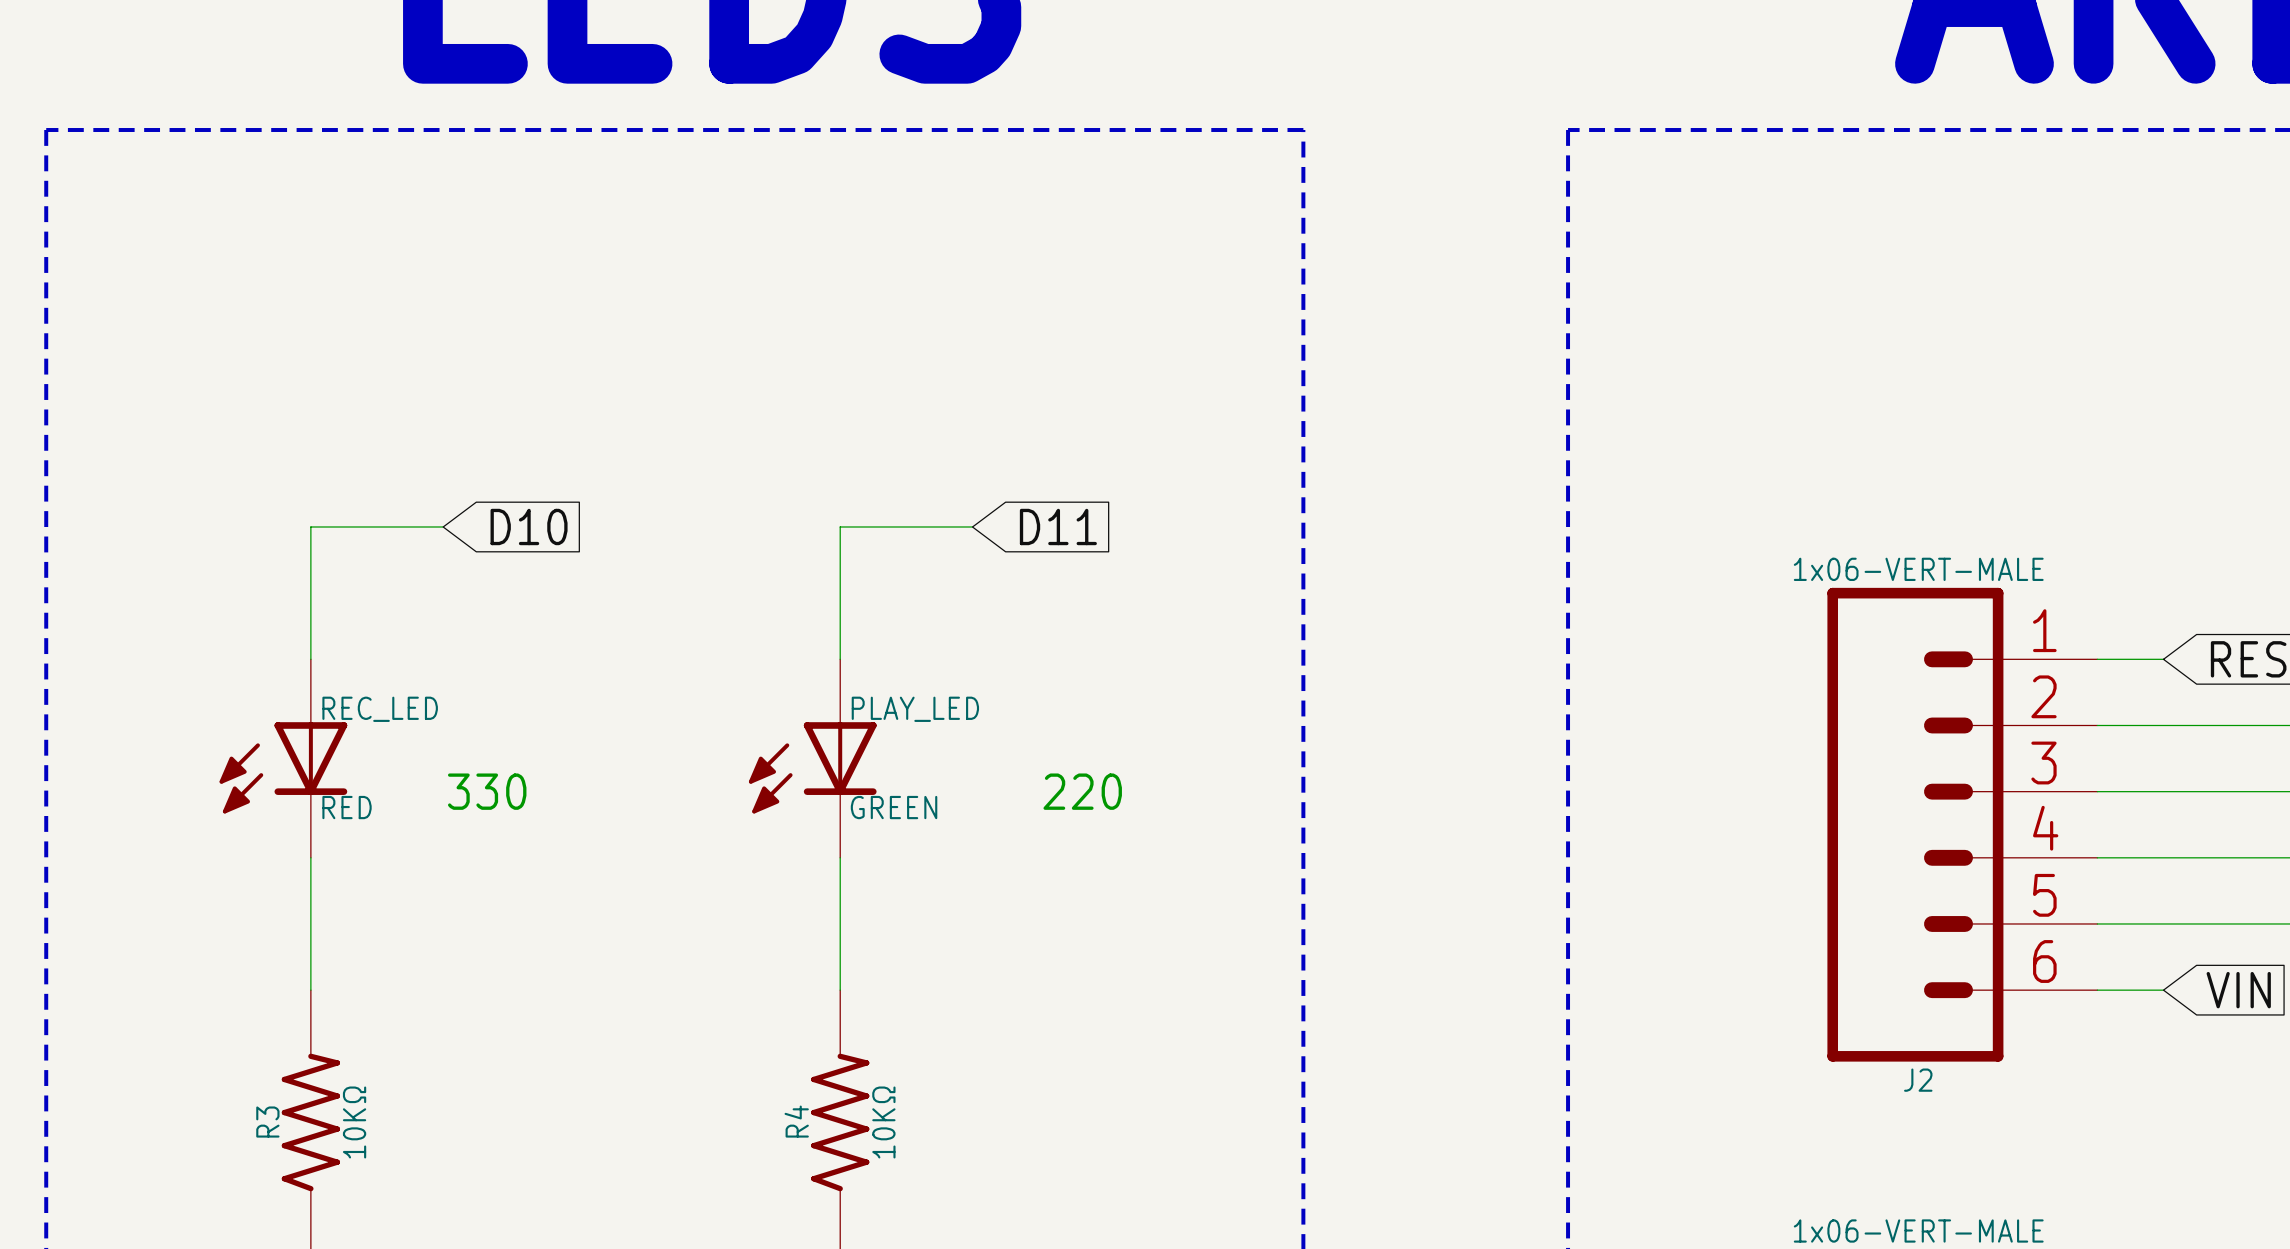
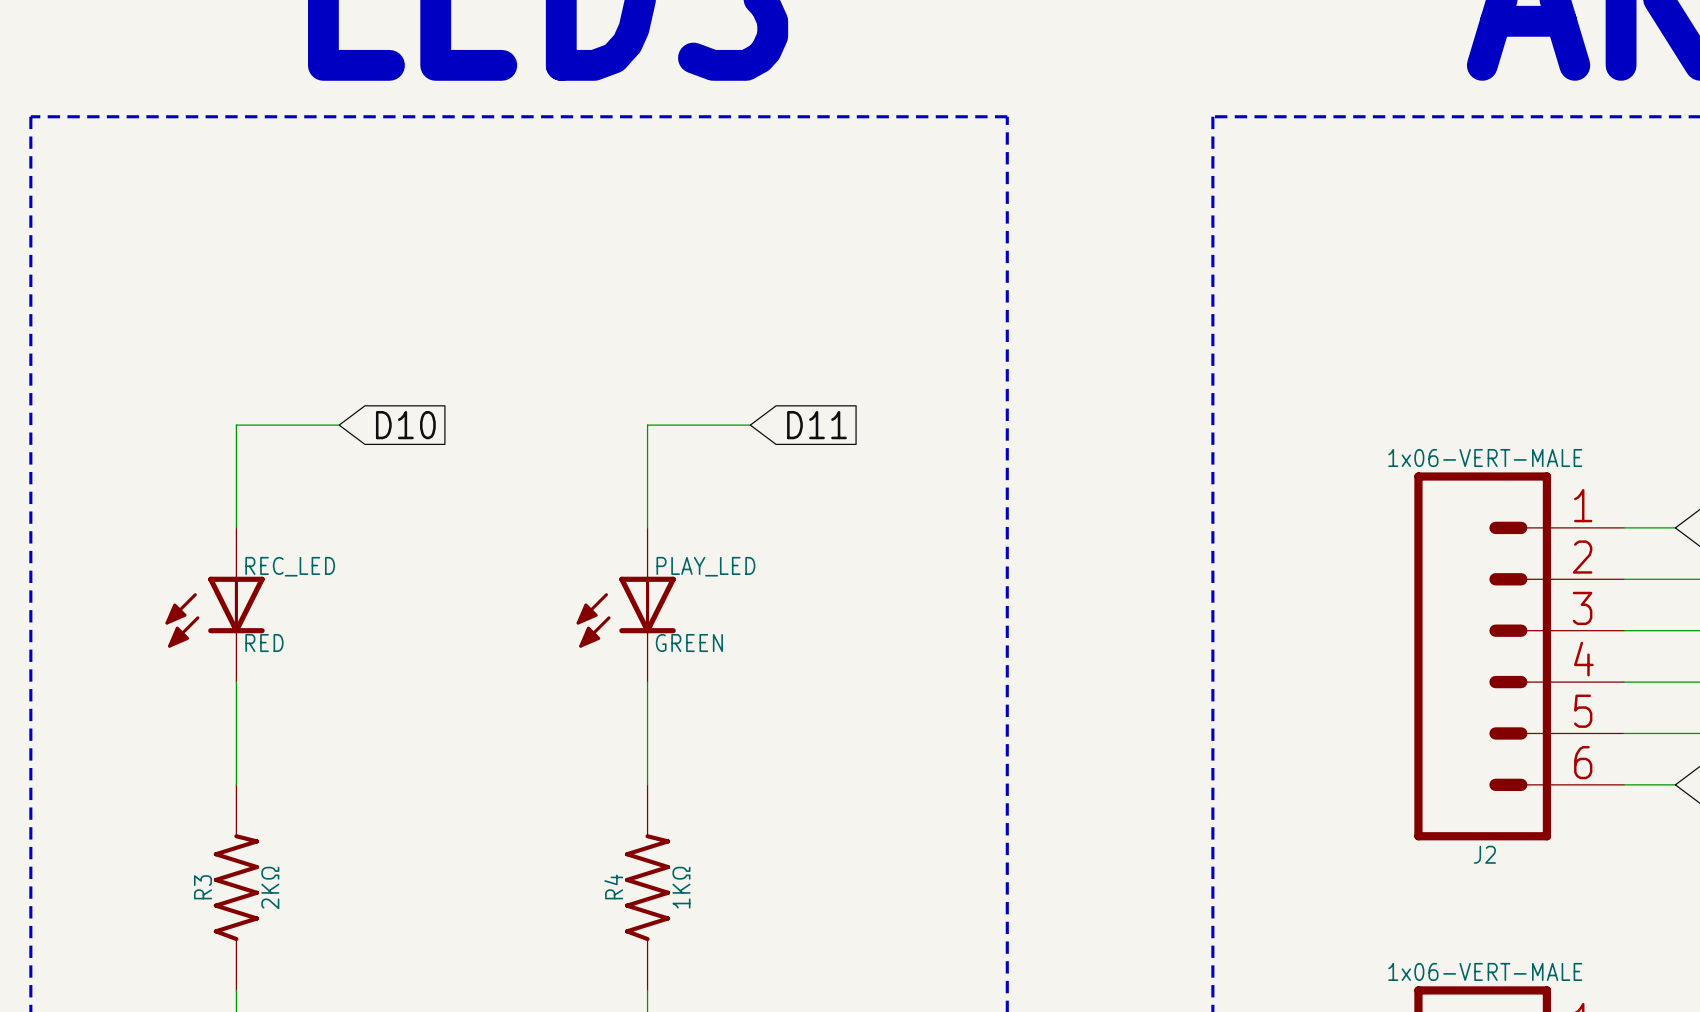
text: 330 (487, 791) -> none
text: 220 (1082, 791) -> none
R3 value: 10KΩ (354, 1122) -> 2KΩ (270, 888)
R4 value: 10KΩ (883, 1122) -> 1KΩ (681, 887)

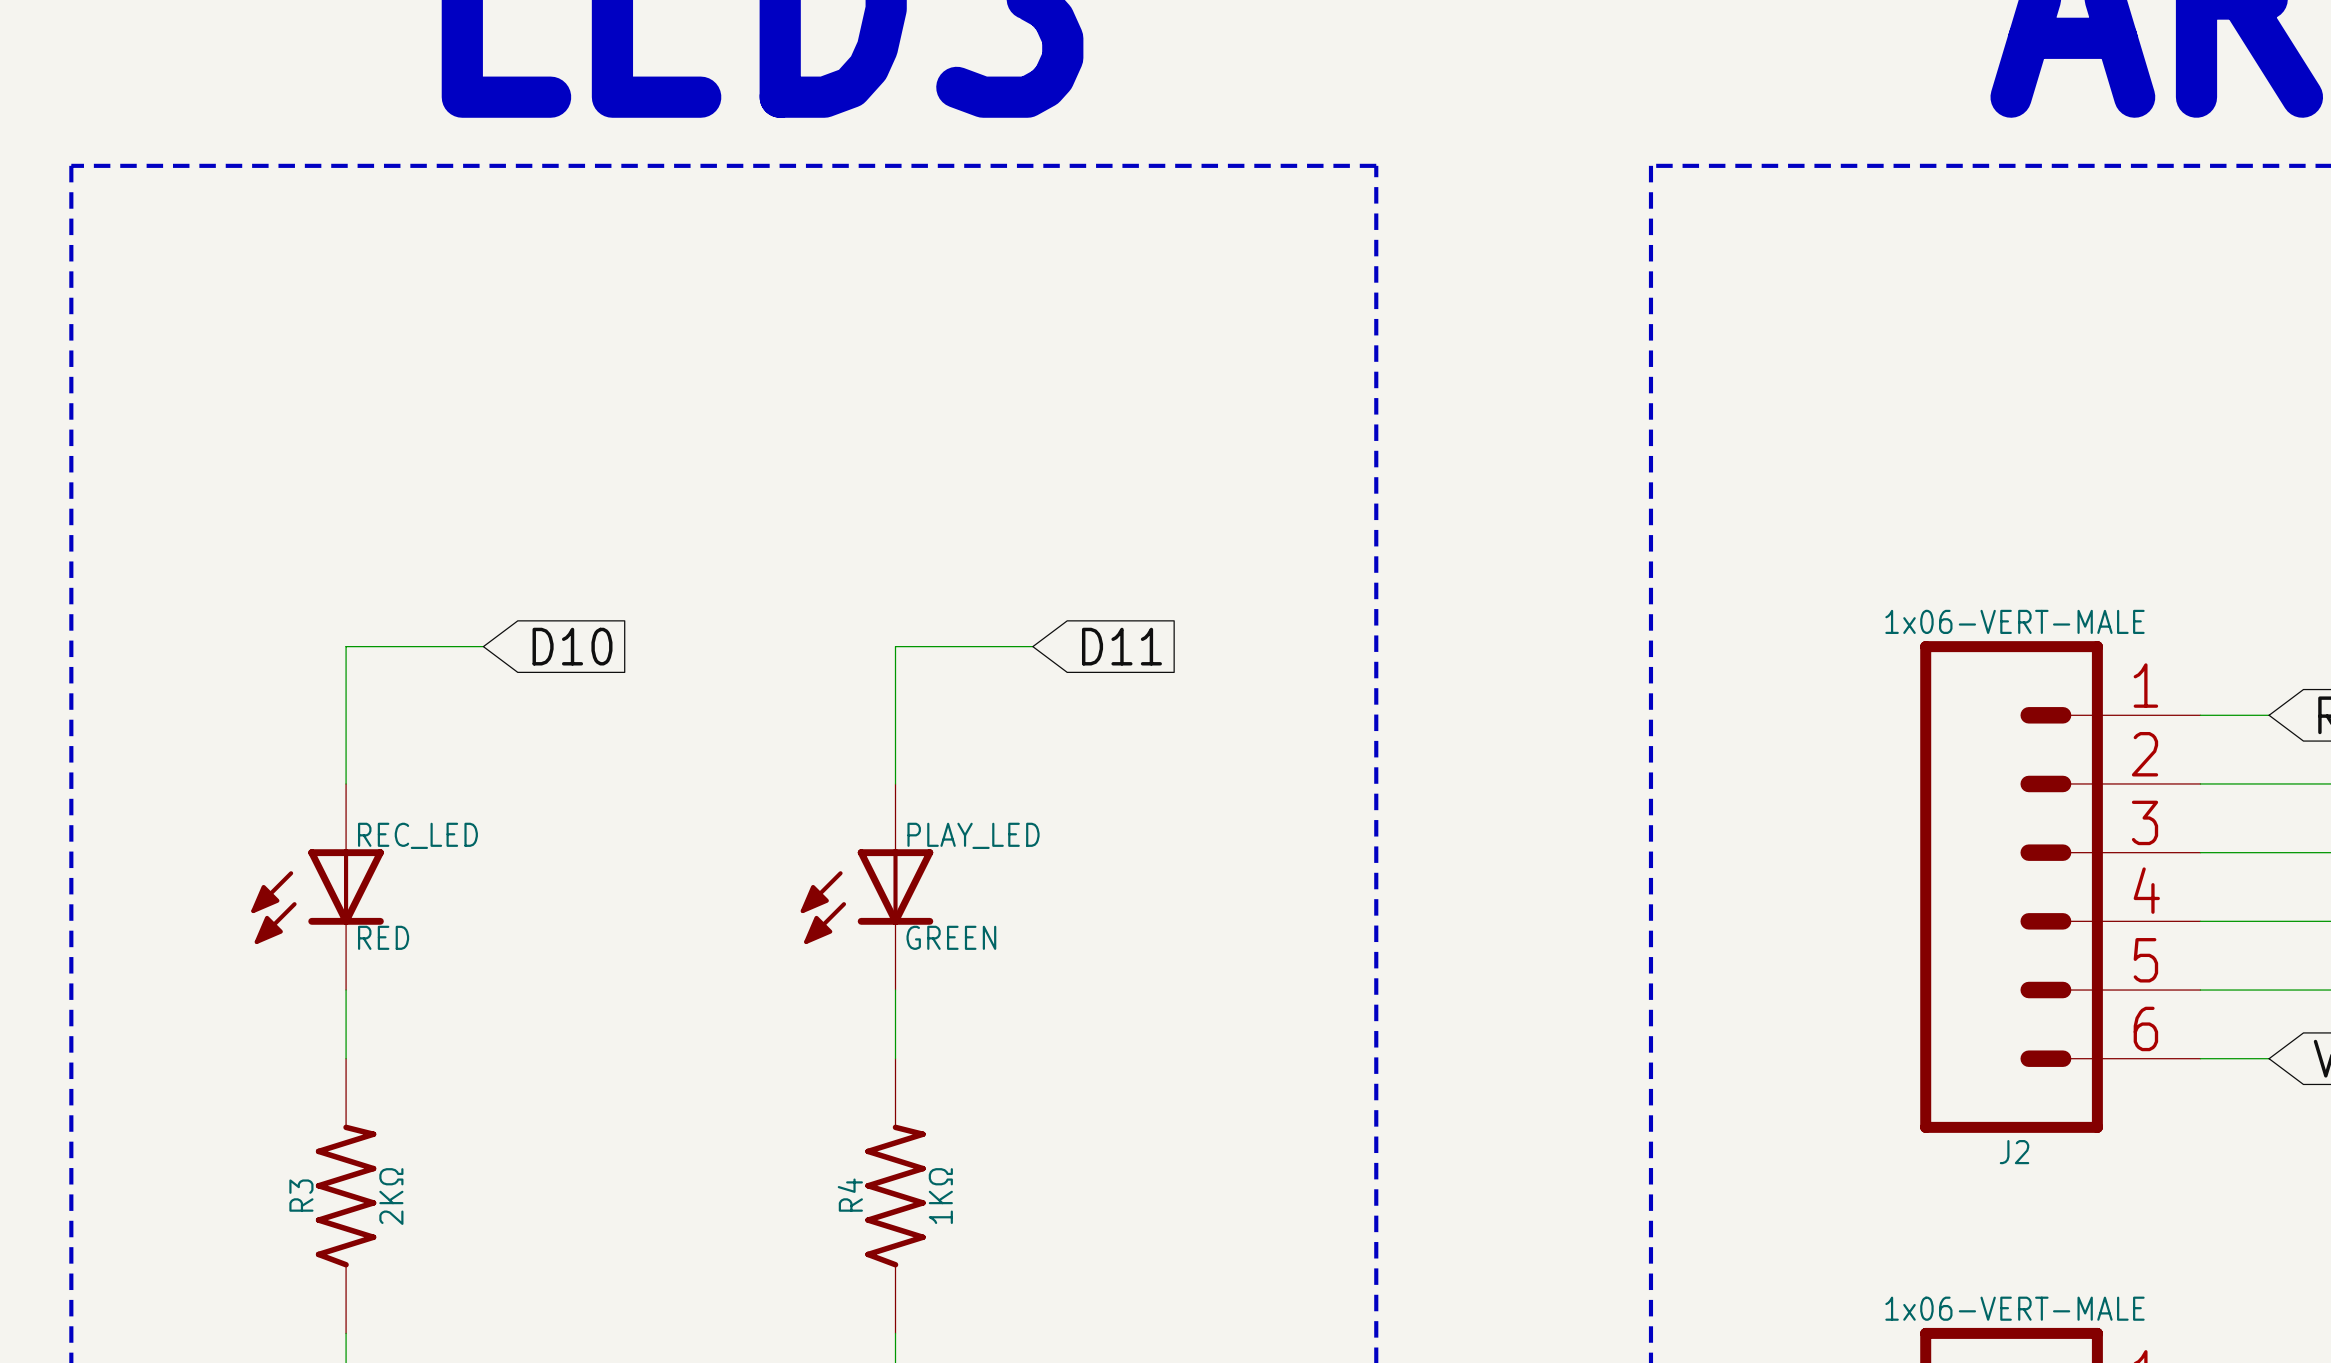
wire: (339, 425) (236, 425) (236, 476) -> (483, 646) (346, 646)
global label position: D10 (405, 425) -> D10 (572, 646)
wire: (750, 425) (647, 425) (647, 476) -> (1032, 646) (895, 646)
global label position: D11 (817, 425) -> D11 (1121, 646)
REC_LED position: (215, 604) -> (317, 887)
PLAY_LED position: (626, 604) -> (867, 887)

